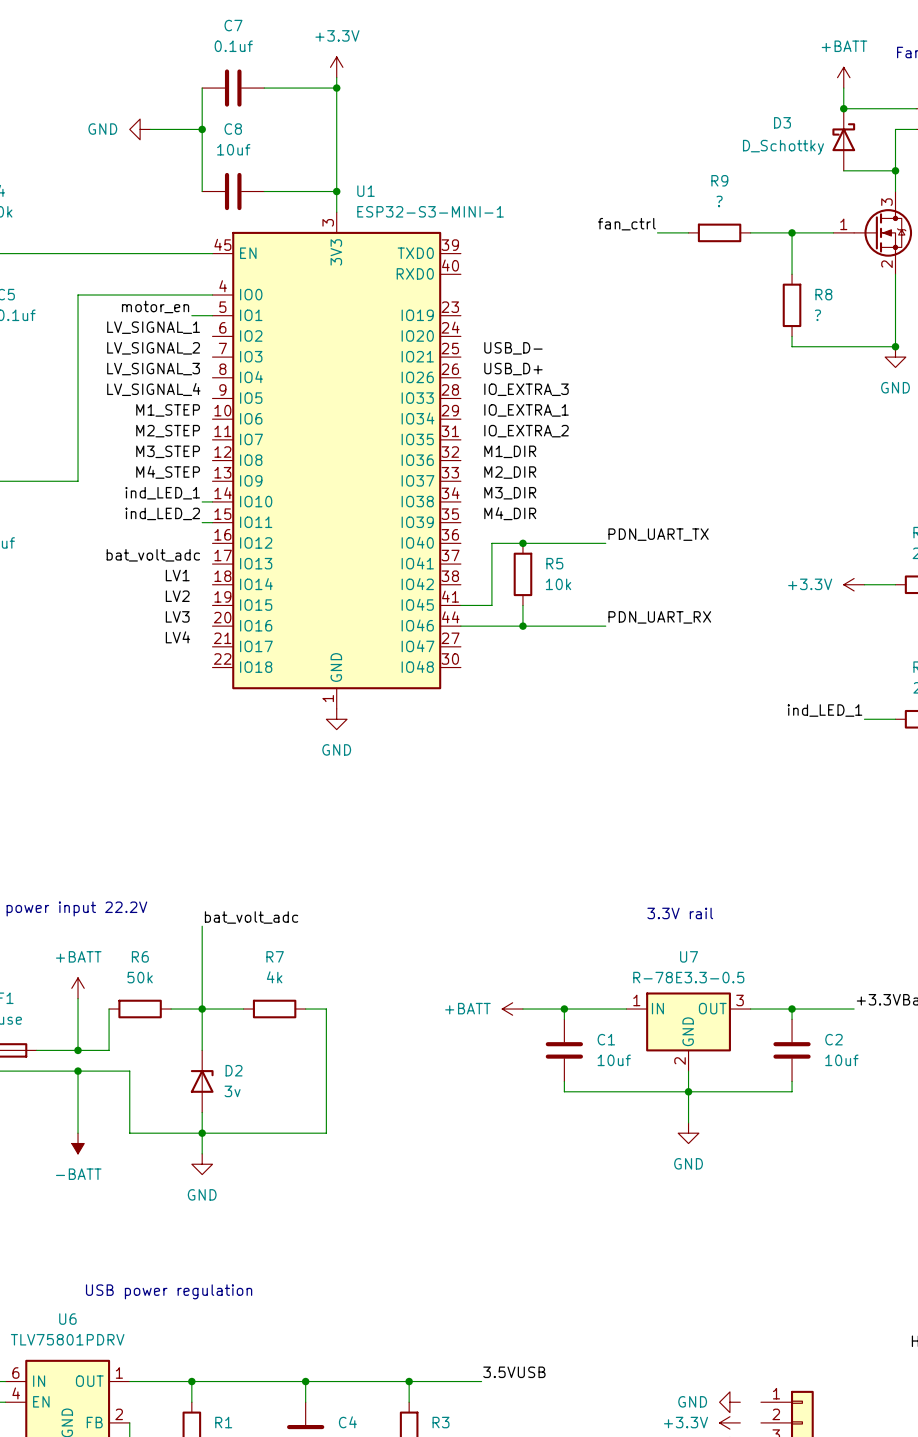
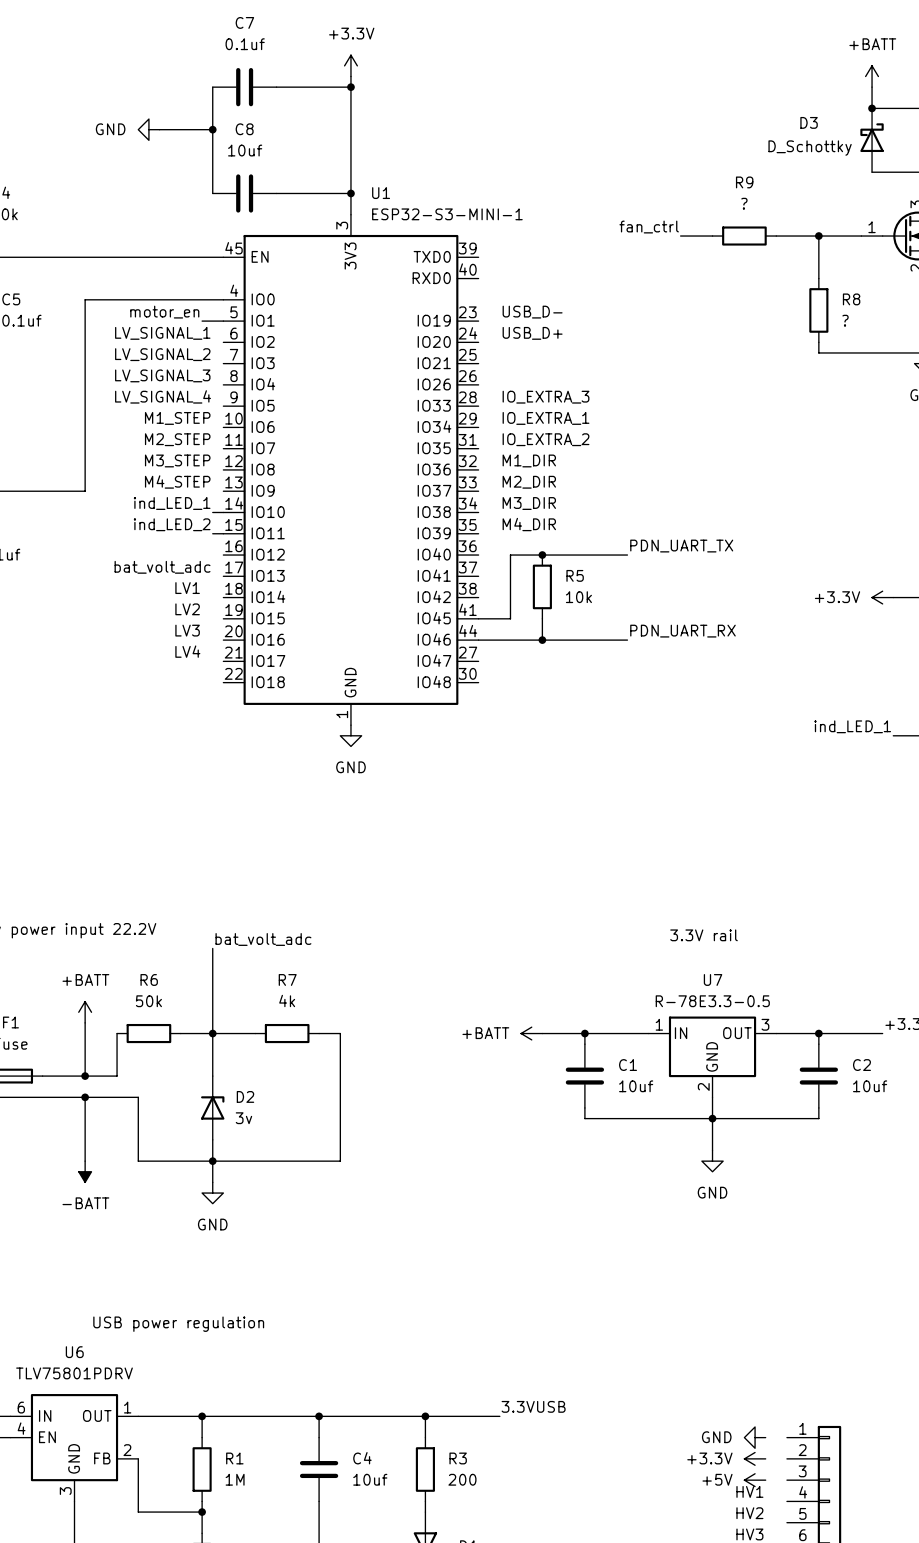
label position: USB_D- (513, 348) -> USB_D- (532, 312)
label position: USB_D+ (513, 369) -> USB_D+ (532, 333)
label: 3.5VUSB (514, 1372) -> 3.3VUSB (533, 1406)

